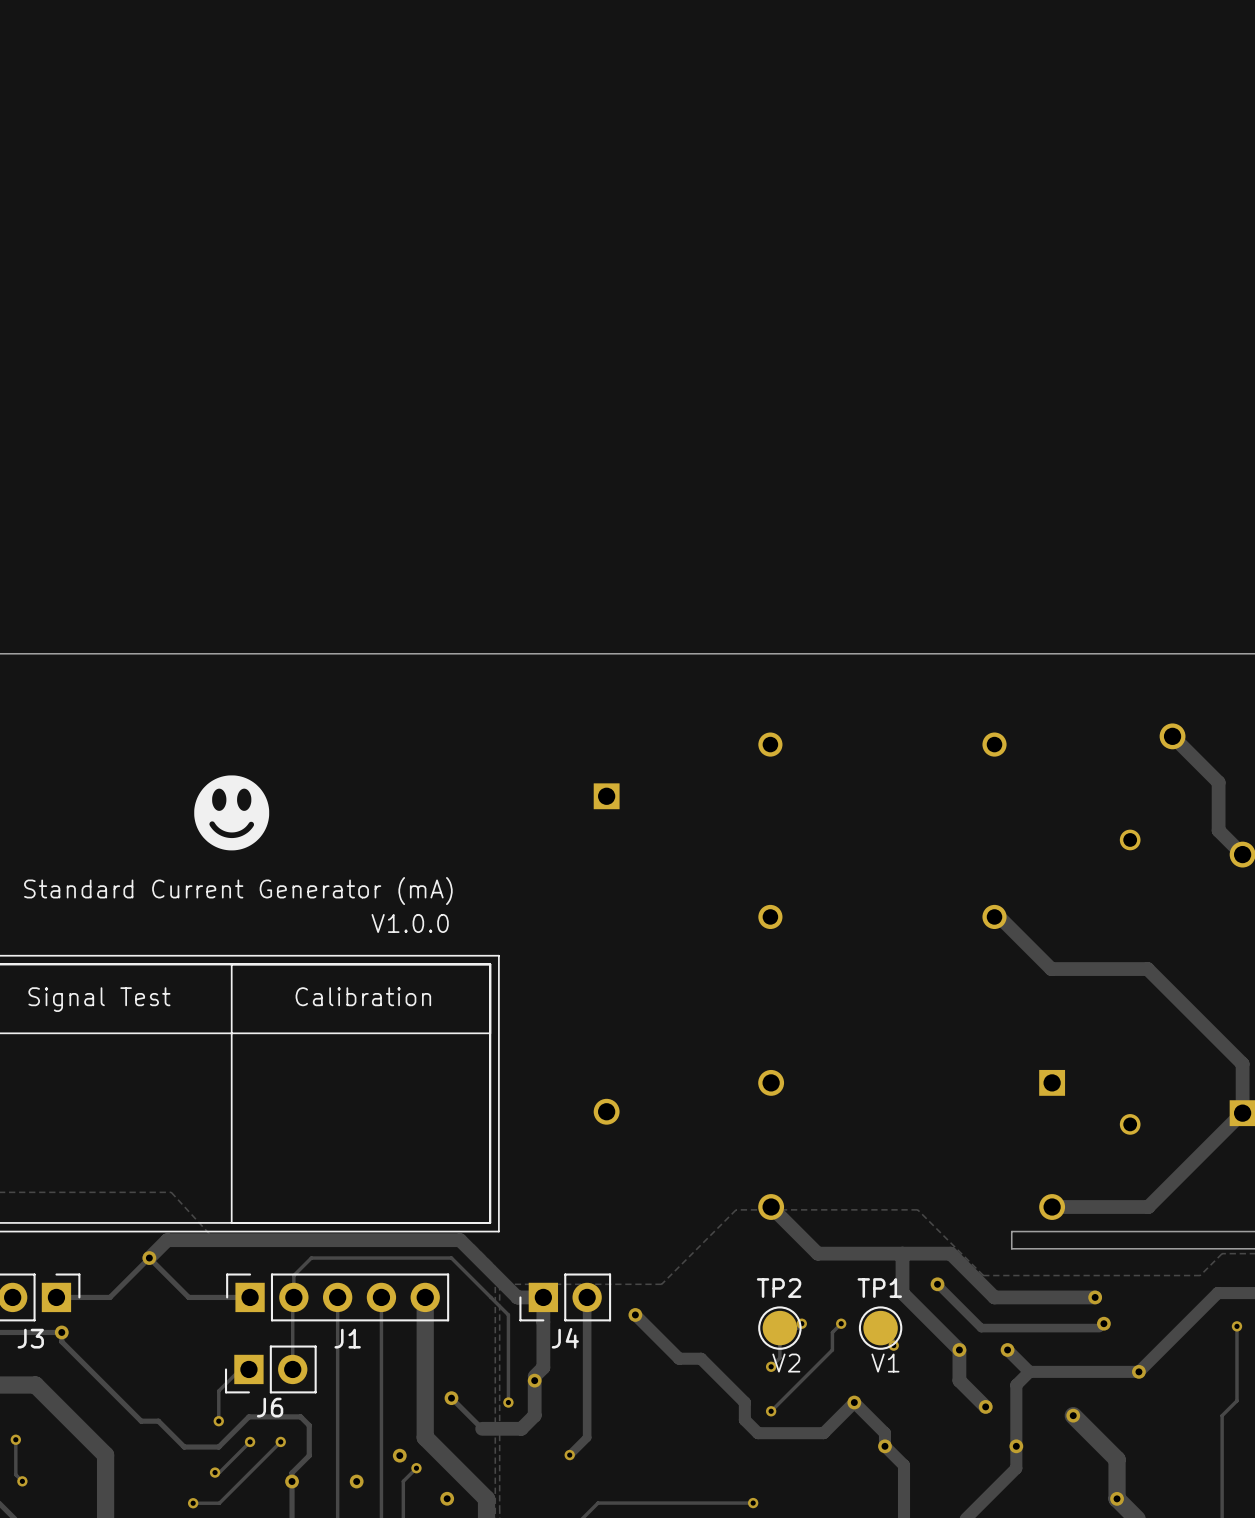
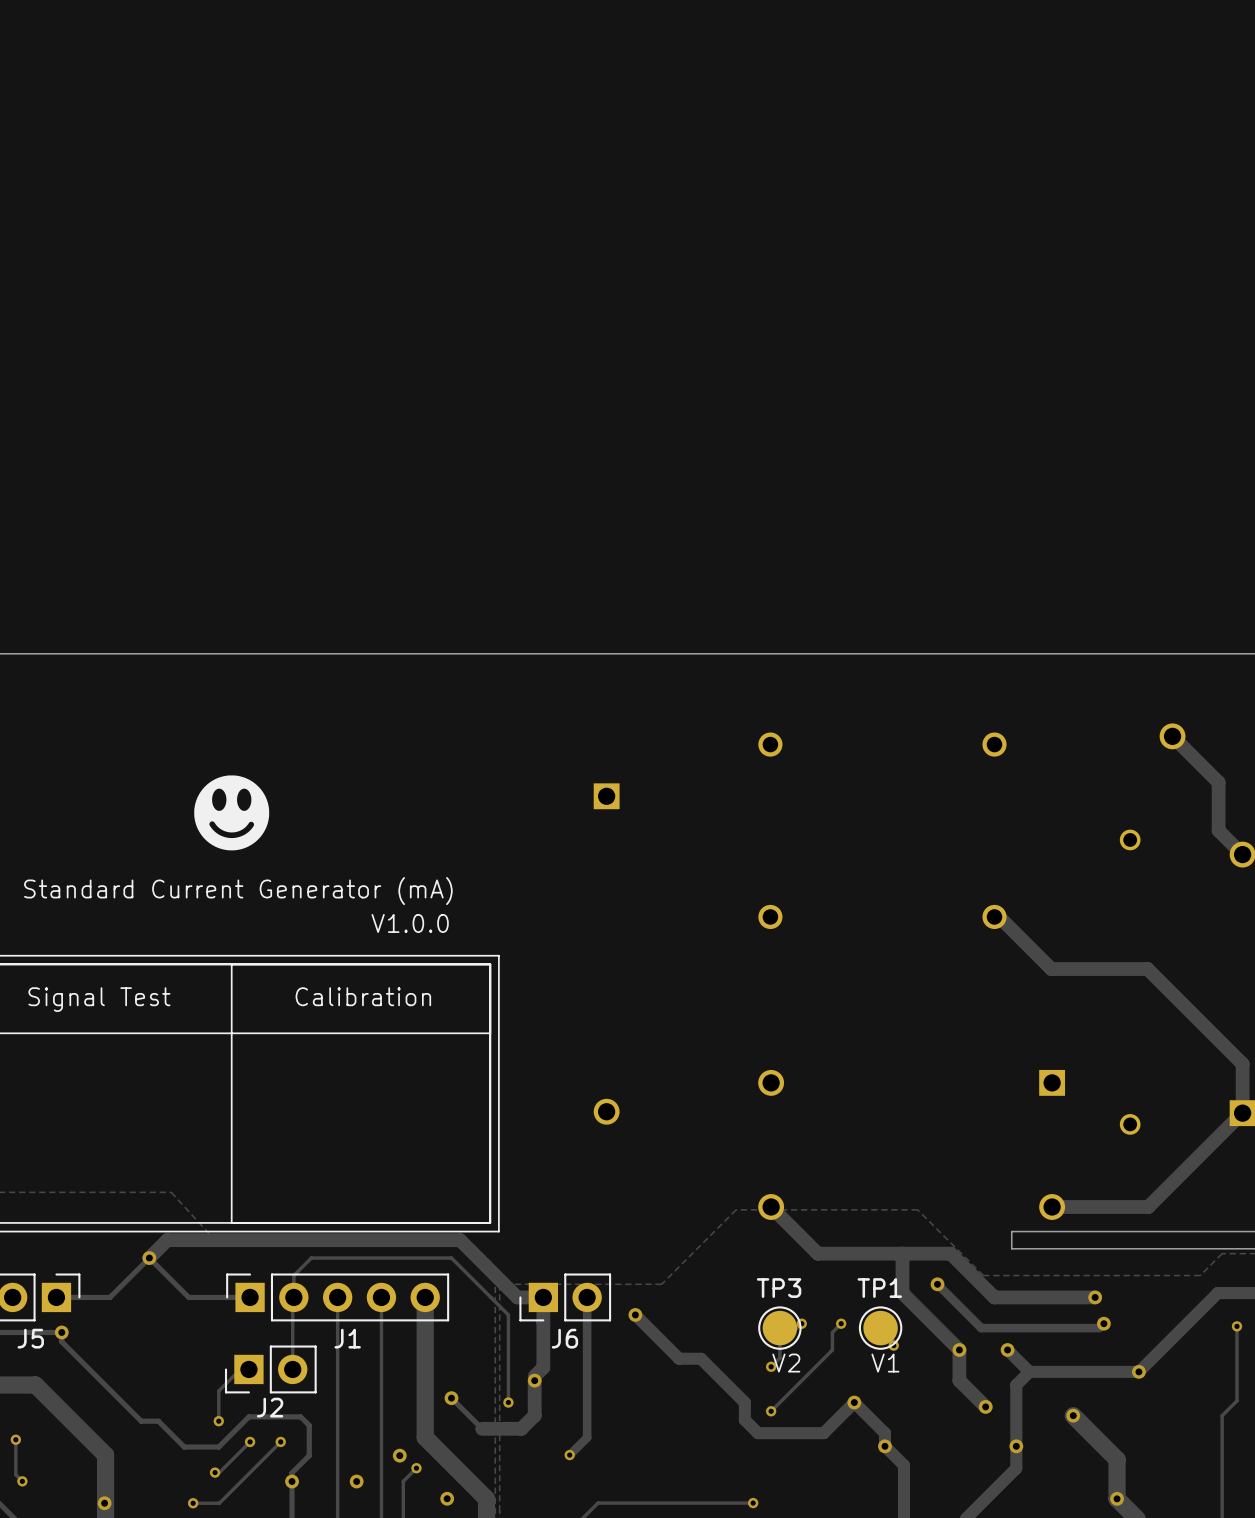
TP2 name: TP2 (779, 1288) -> TP3 (779, 1288)
J3 name: J3 (30, 1338) -> J5 (30, 1338)
J4 name: J4 (565, 1338) -> J6 (564, 1338)
J6 name: J6 (270, 1407) -> J2 (270, 1407)
via: none -> (104, 1503)

